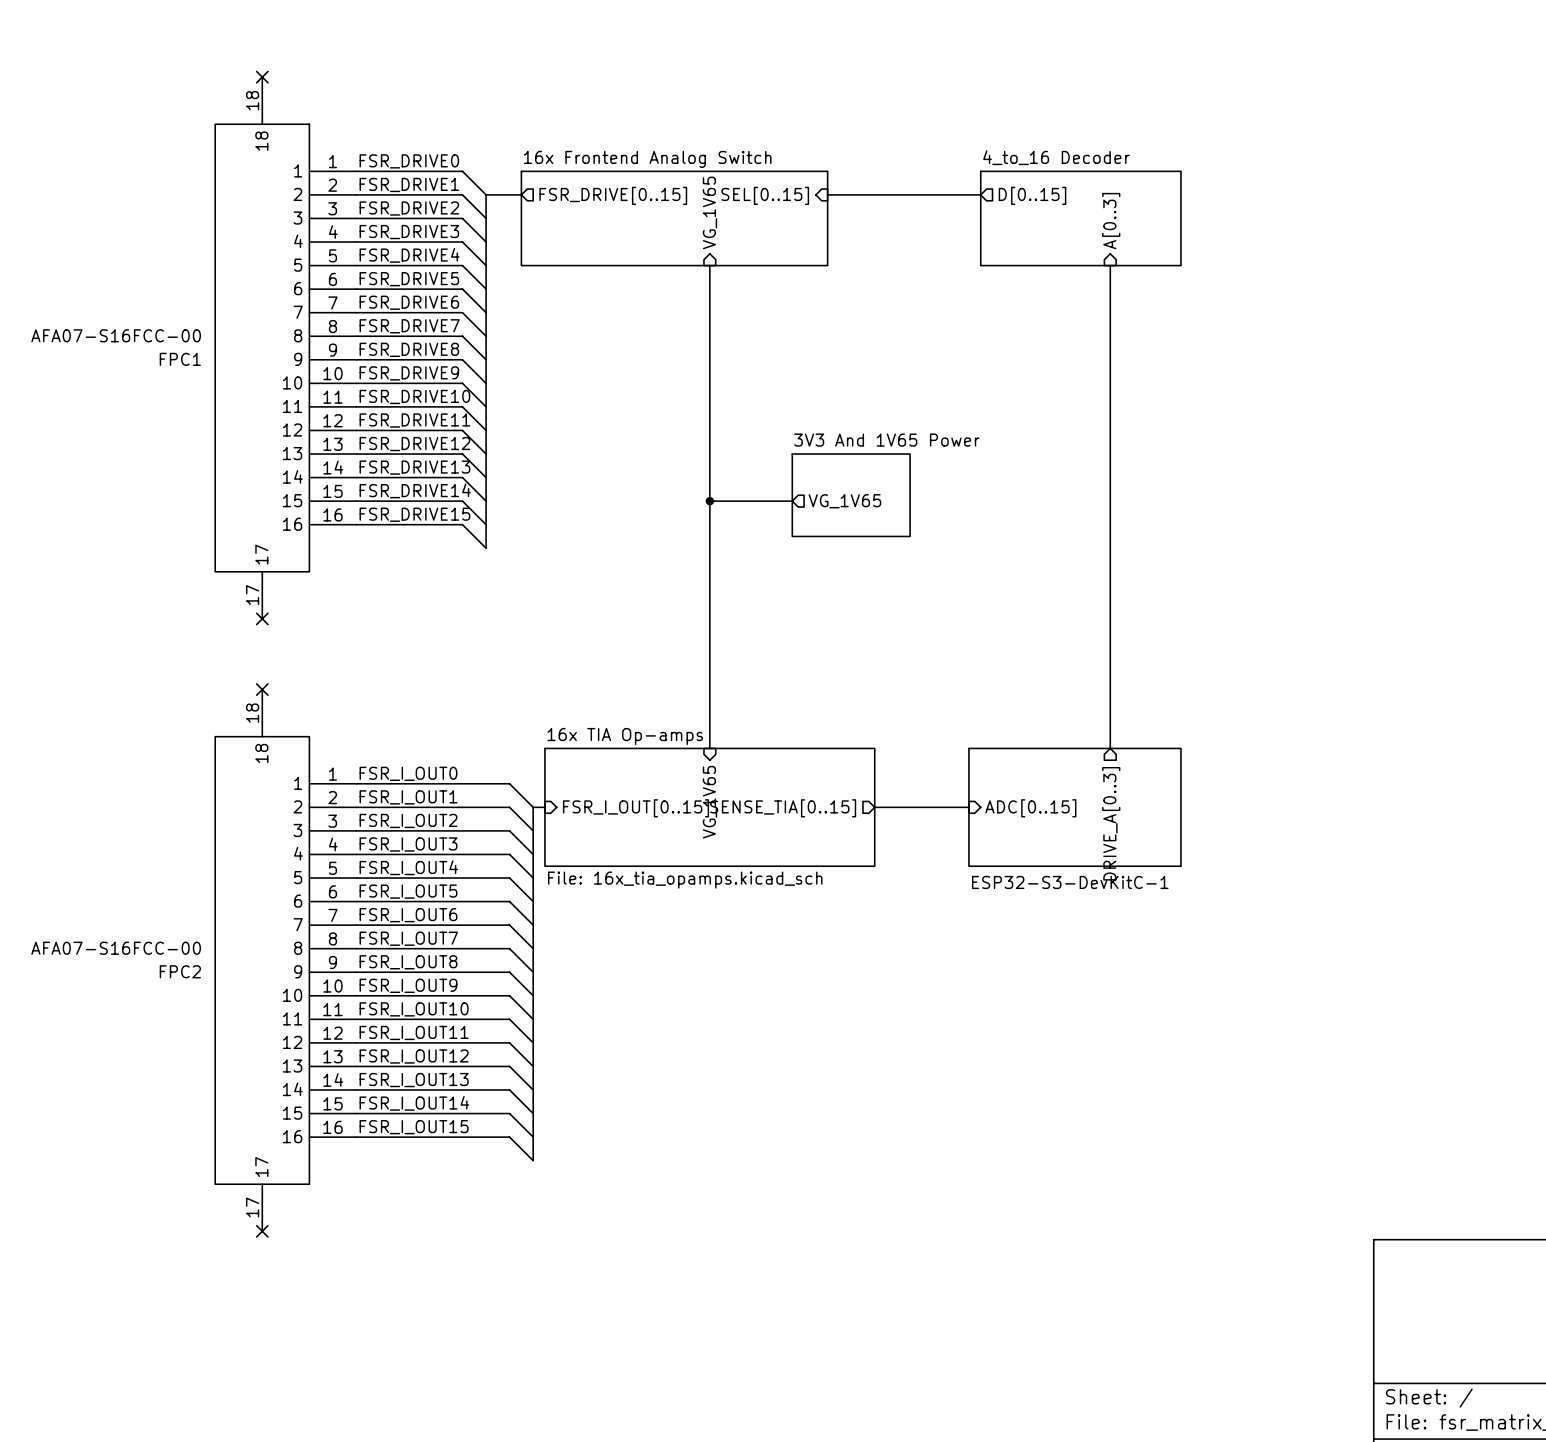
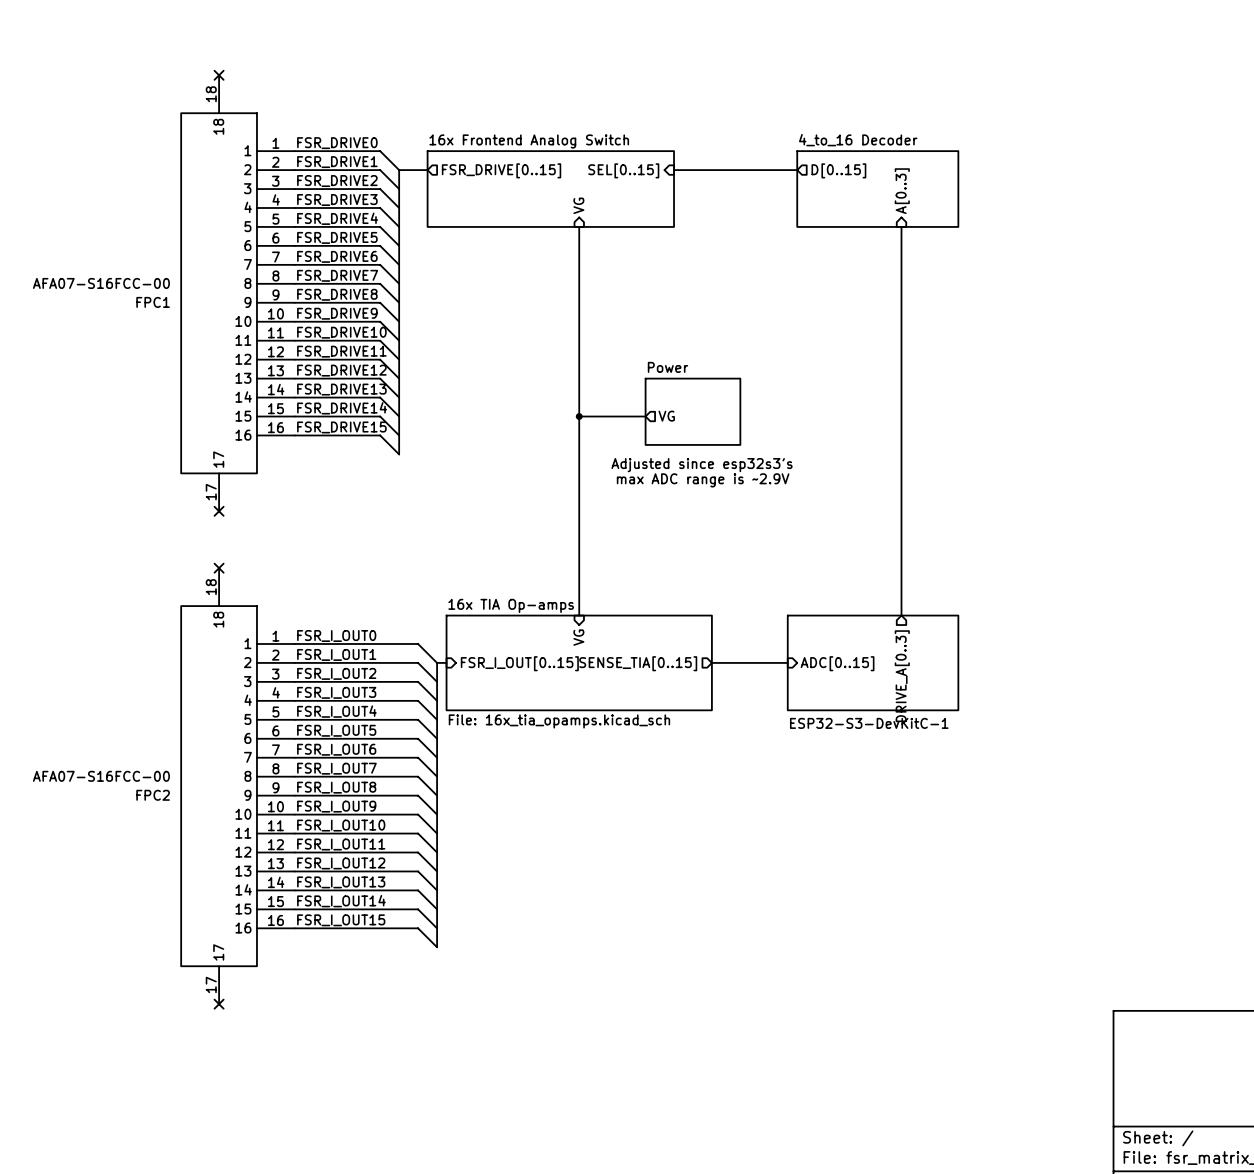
sheet pin: VG_1V65 (709, 212) -> VG (578, 205)
sheet 3V3 And 1V65 Power name: 3V3 And 1V65 Power (886, 440) -> Power (668, 367)
sheet pin: VG_1V65 (844, 501) -> VG (666, 416)
text: none -> Adjusted since esp32s3's (702, 465)
text: none -> max ADC range is ~2.9V (703, 480)
sheet pin: VG_1V65 (709, 802) -> VG (578, 637)

